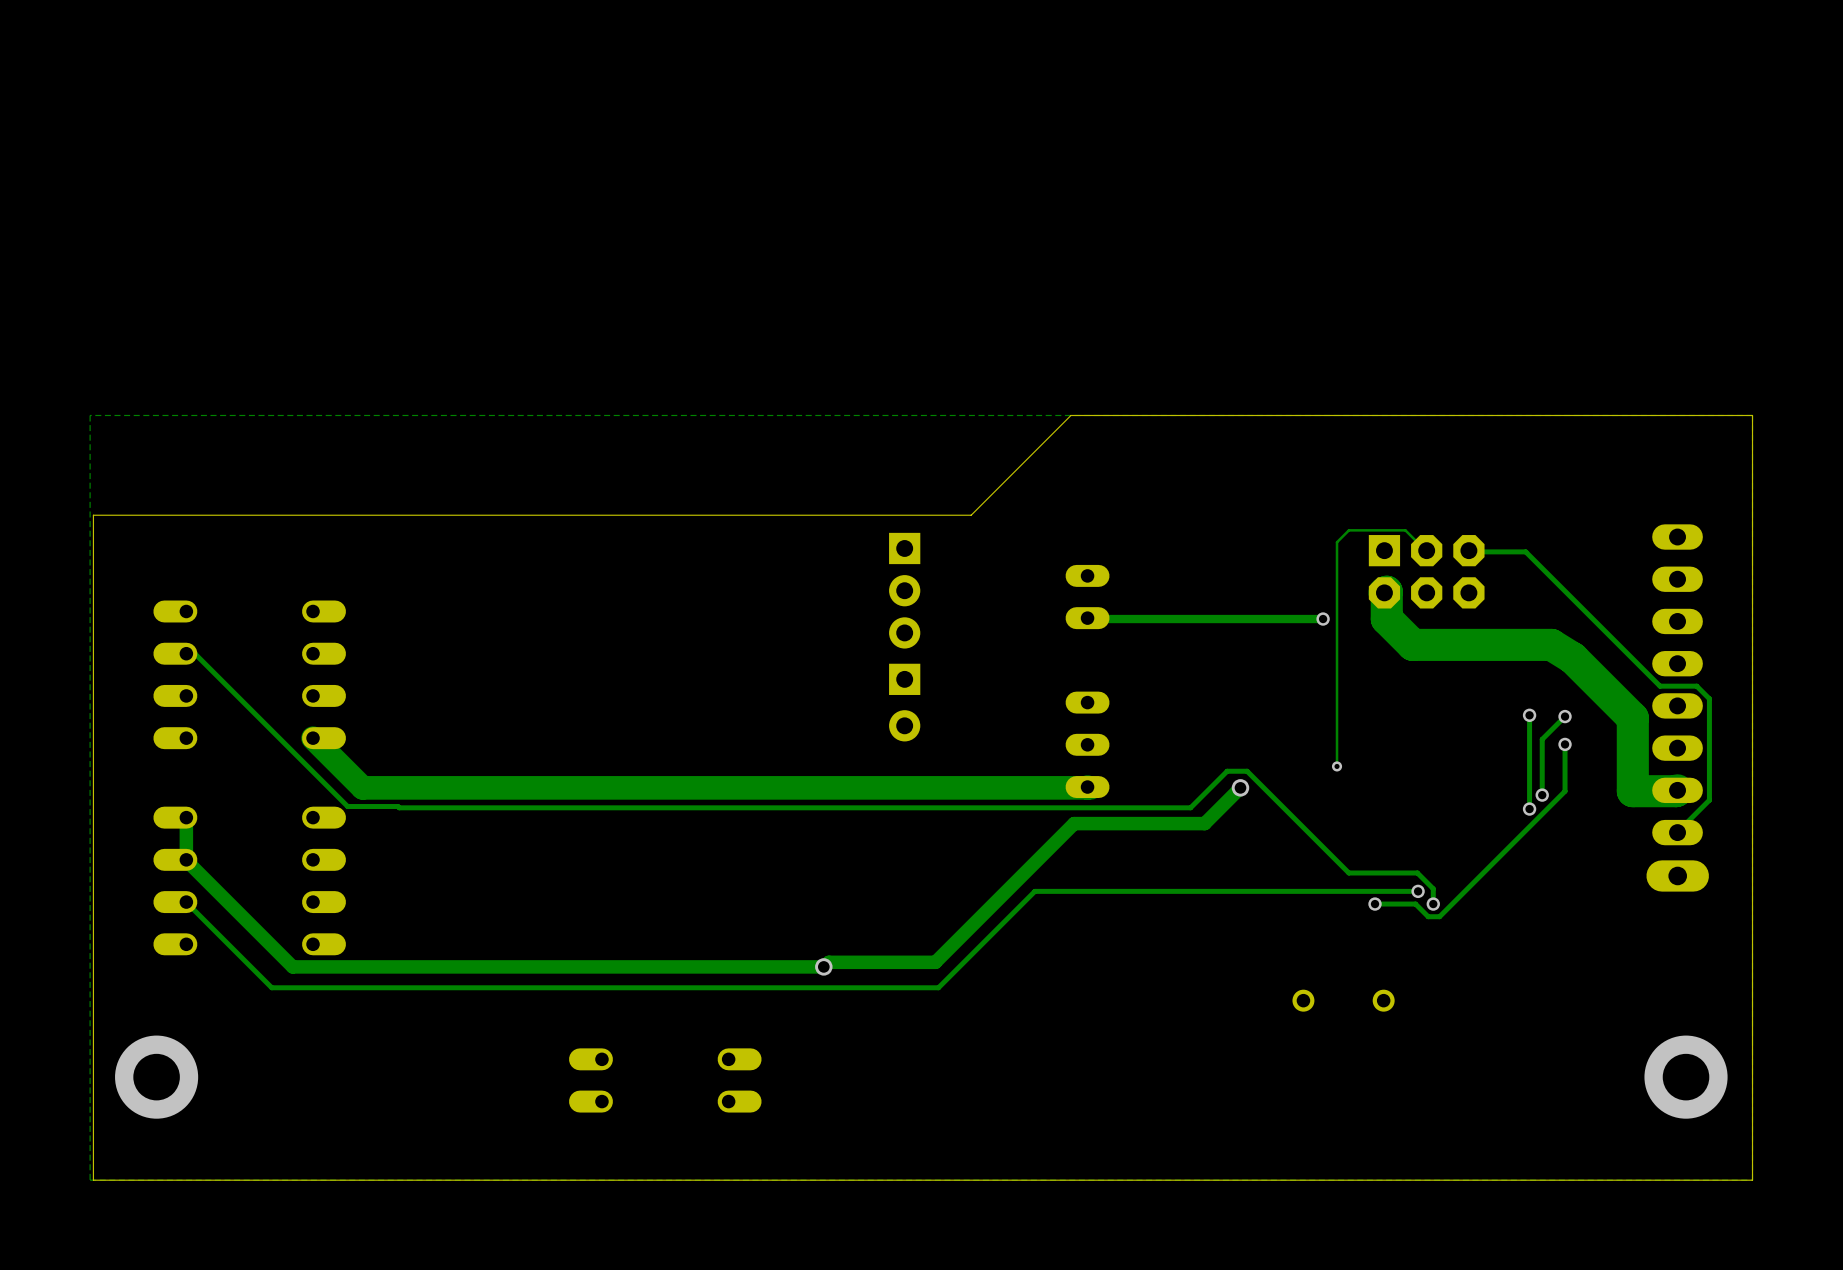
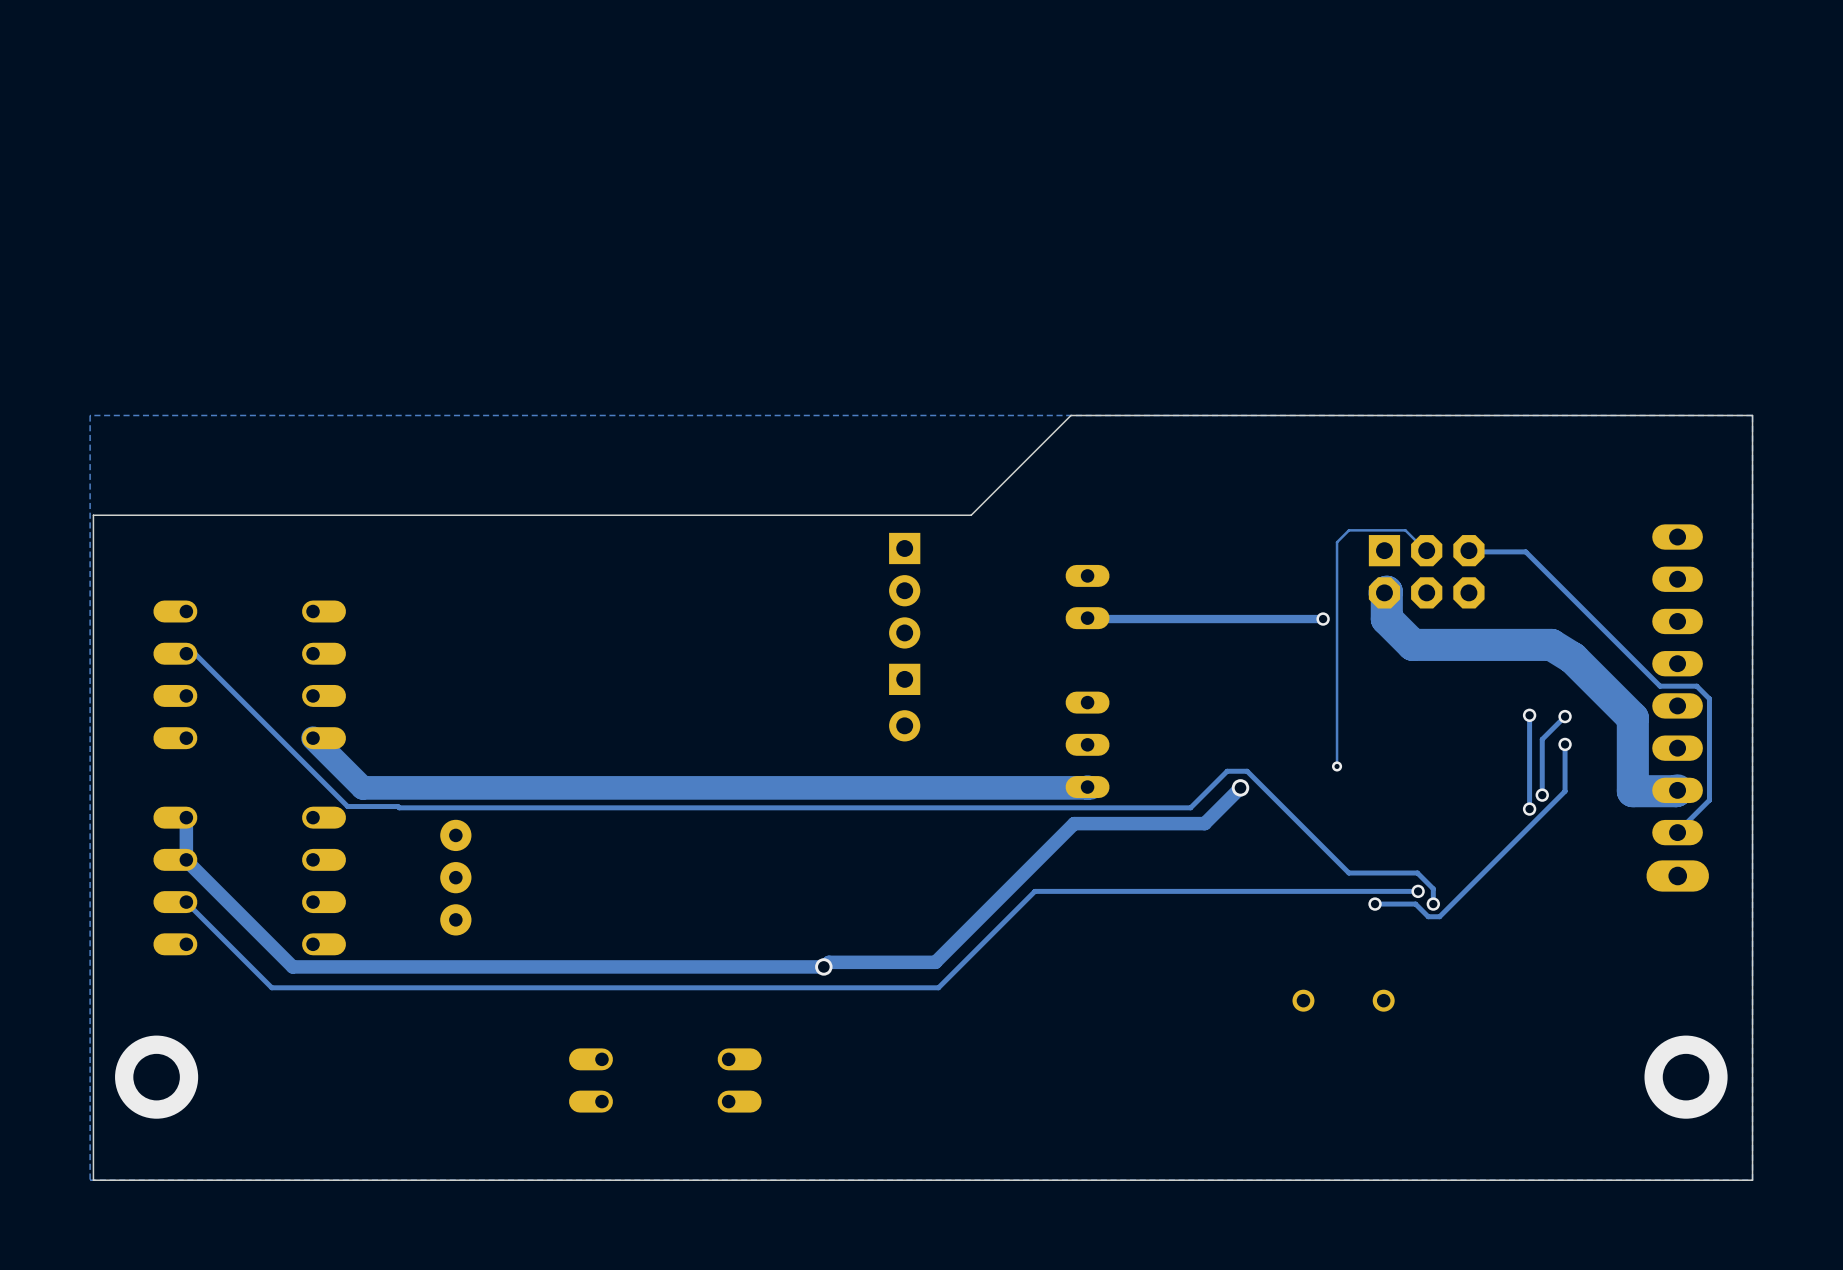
part: none -> (455, 877)

